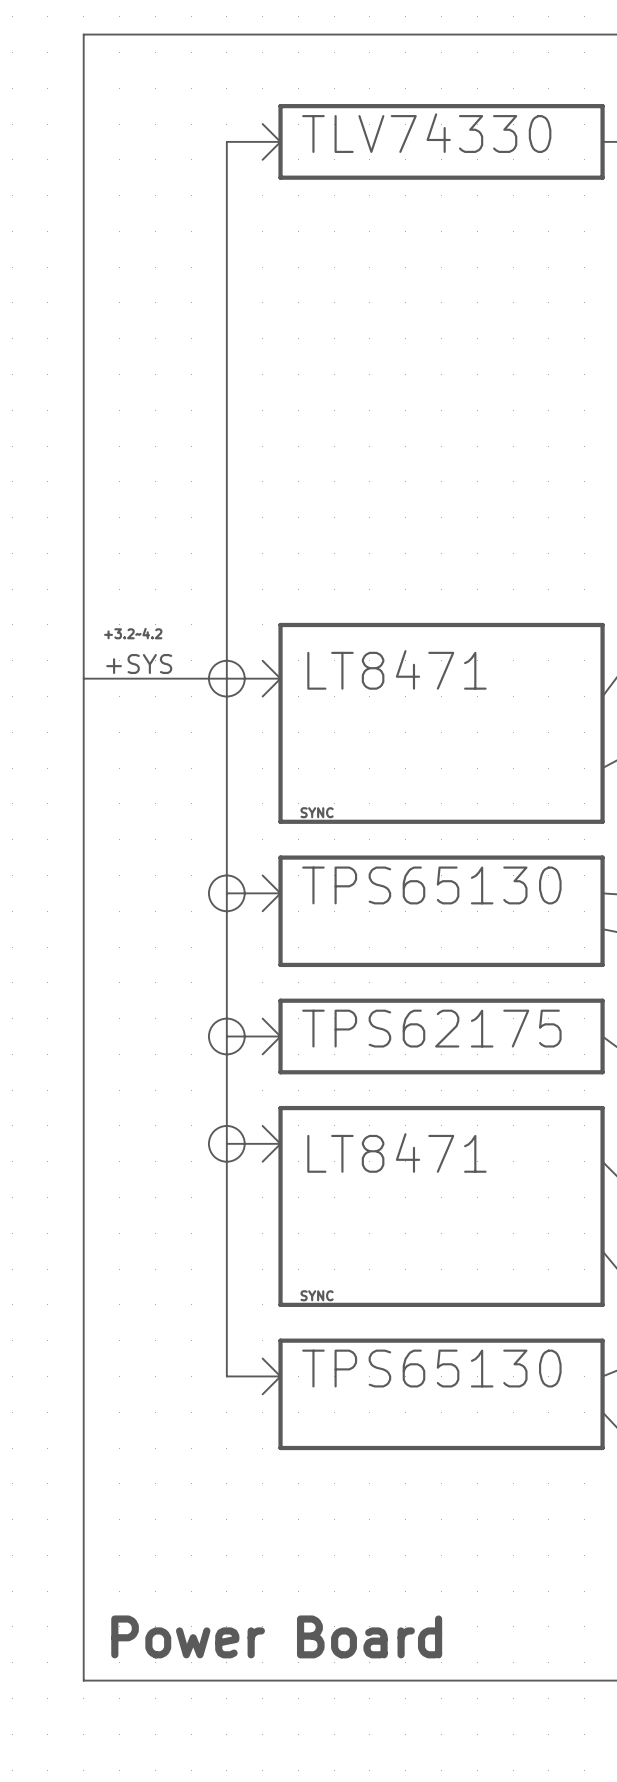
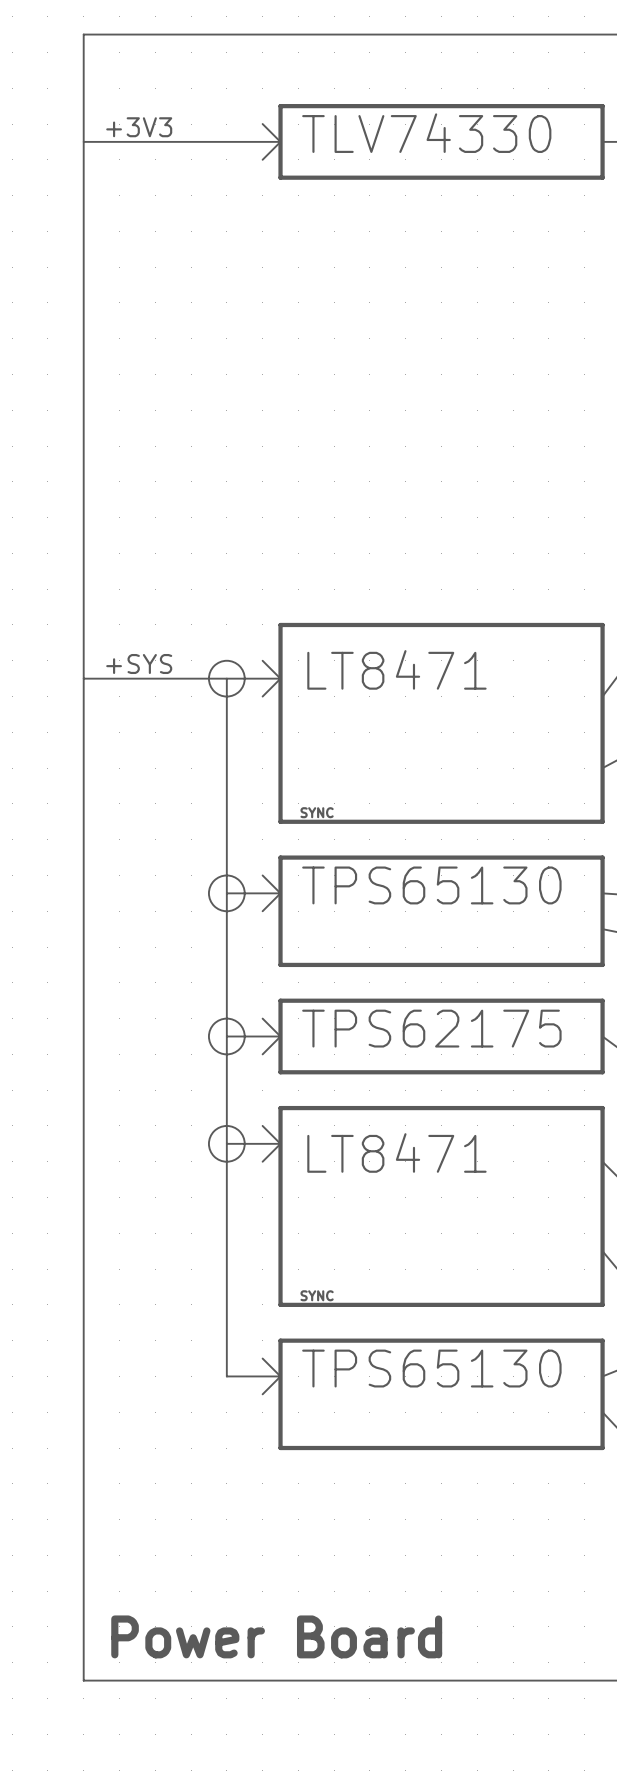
text: none -> +3V3 (139, 127)
line: (226, 141) (226, 678) -> (226, 141) (83, 141)
text: +3.2~4.2 (133, 633) -> none

